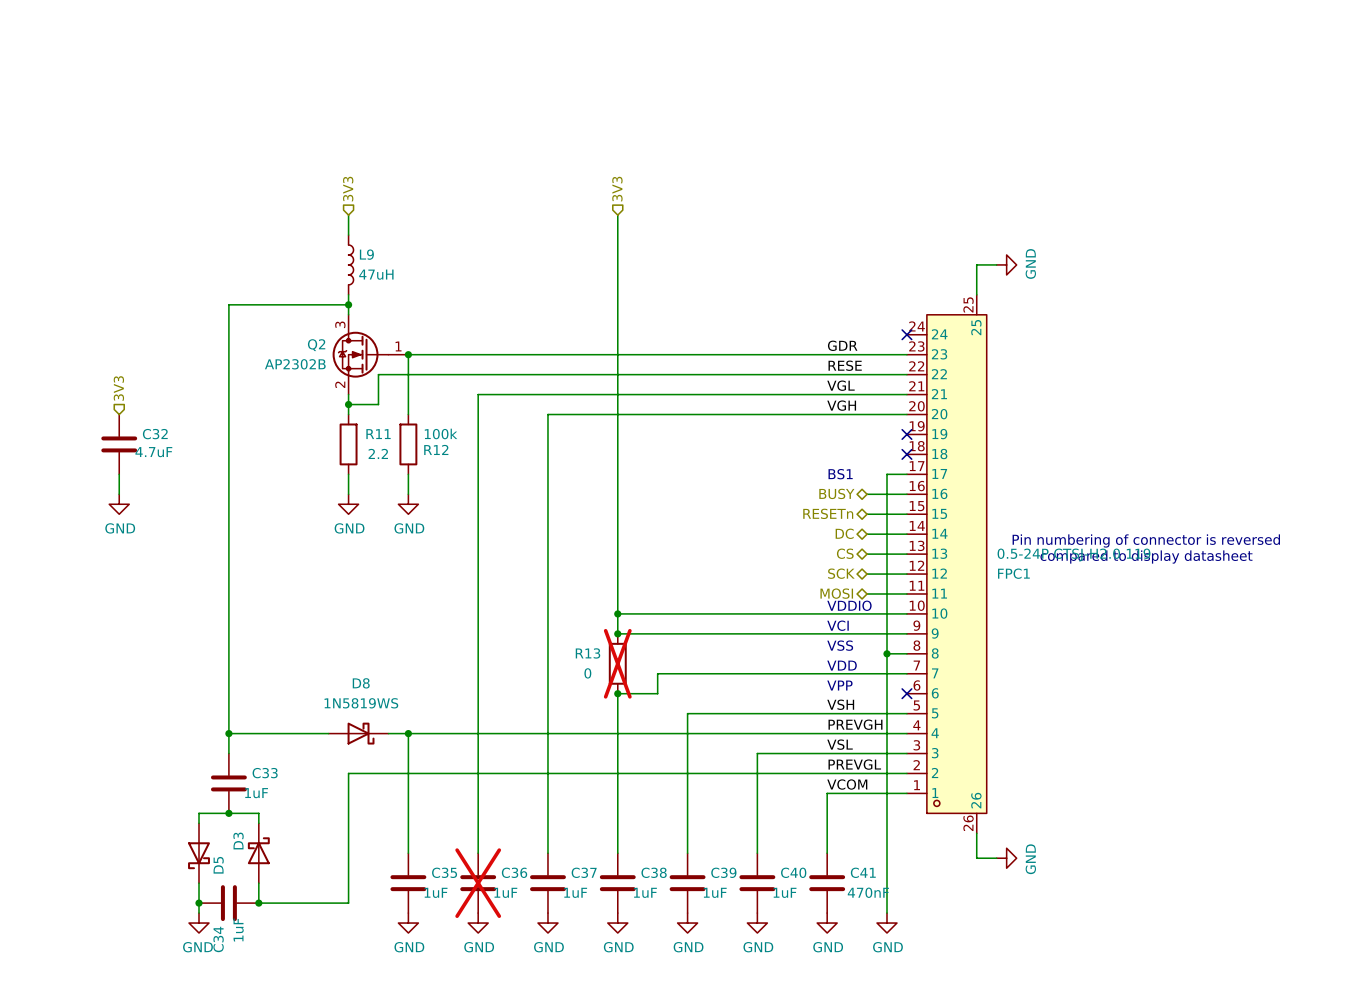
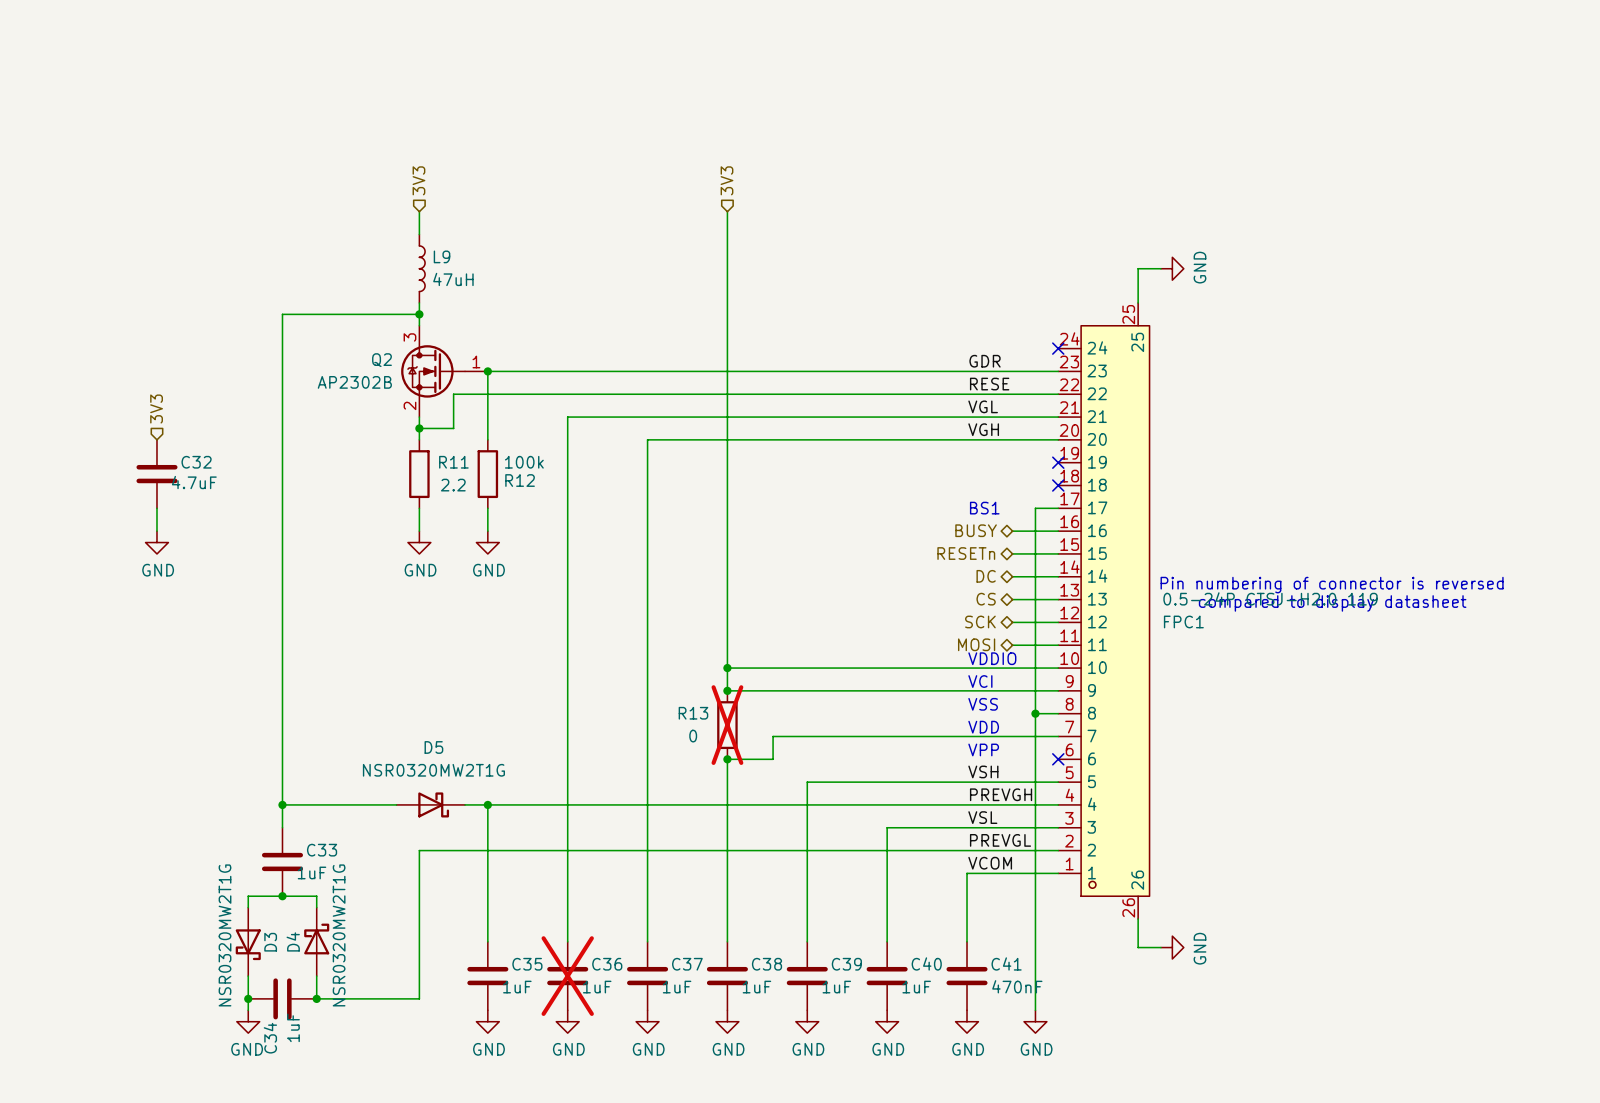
D8 name: D8 (361, 683) -> D5 (433, 747)
D8 value: 1N5819WS (361, 703) -> NSR0320MW2T1G (433, 770)
D3 name: D3 (238, 841) -> D4 (293, 941)
D3 value: none -> NSR0320MW2T1G (339, 935)
D5: (199, 853) -> none
D3: none -> NSR0320MW2T1G (248, 941)

